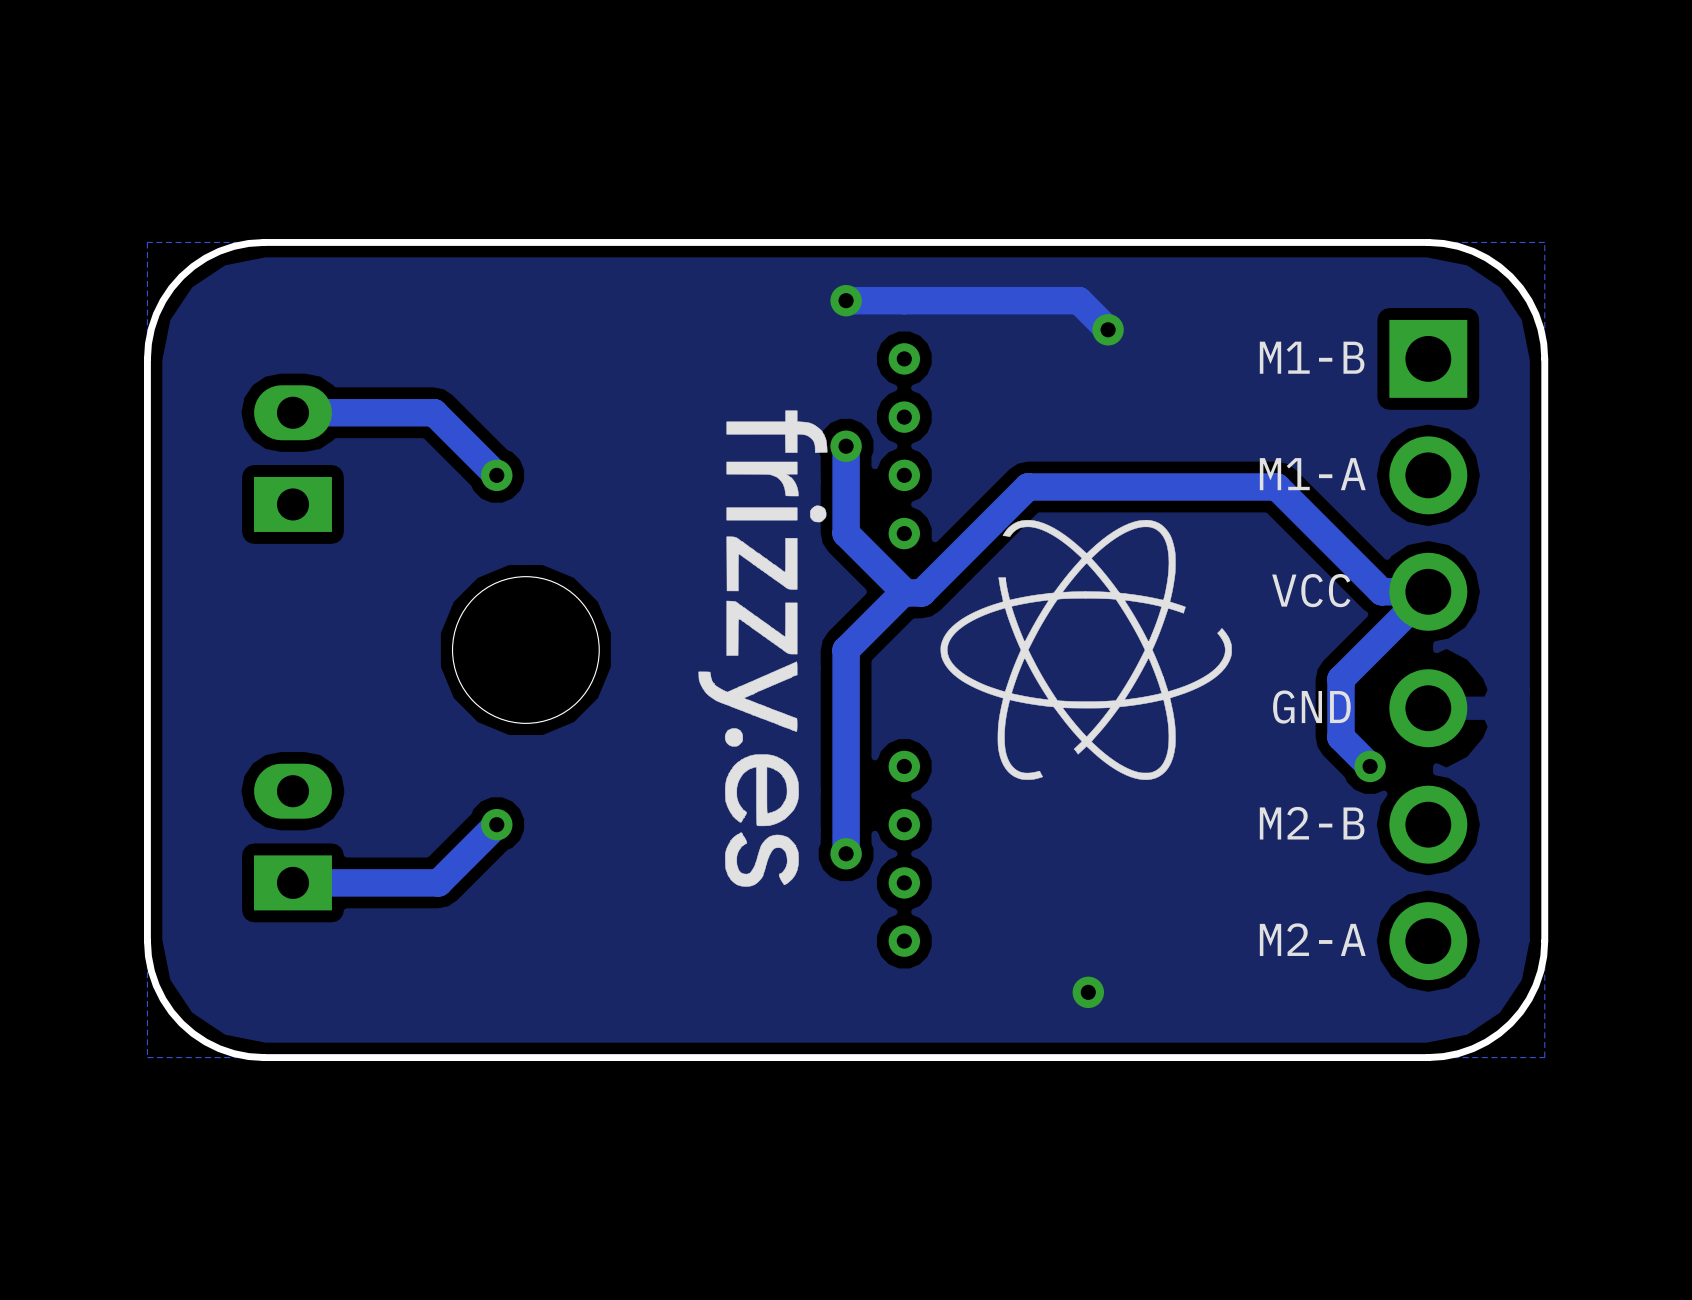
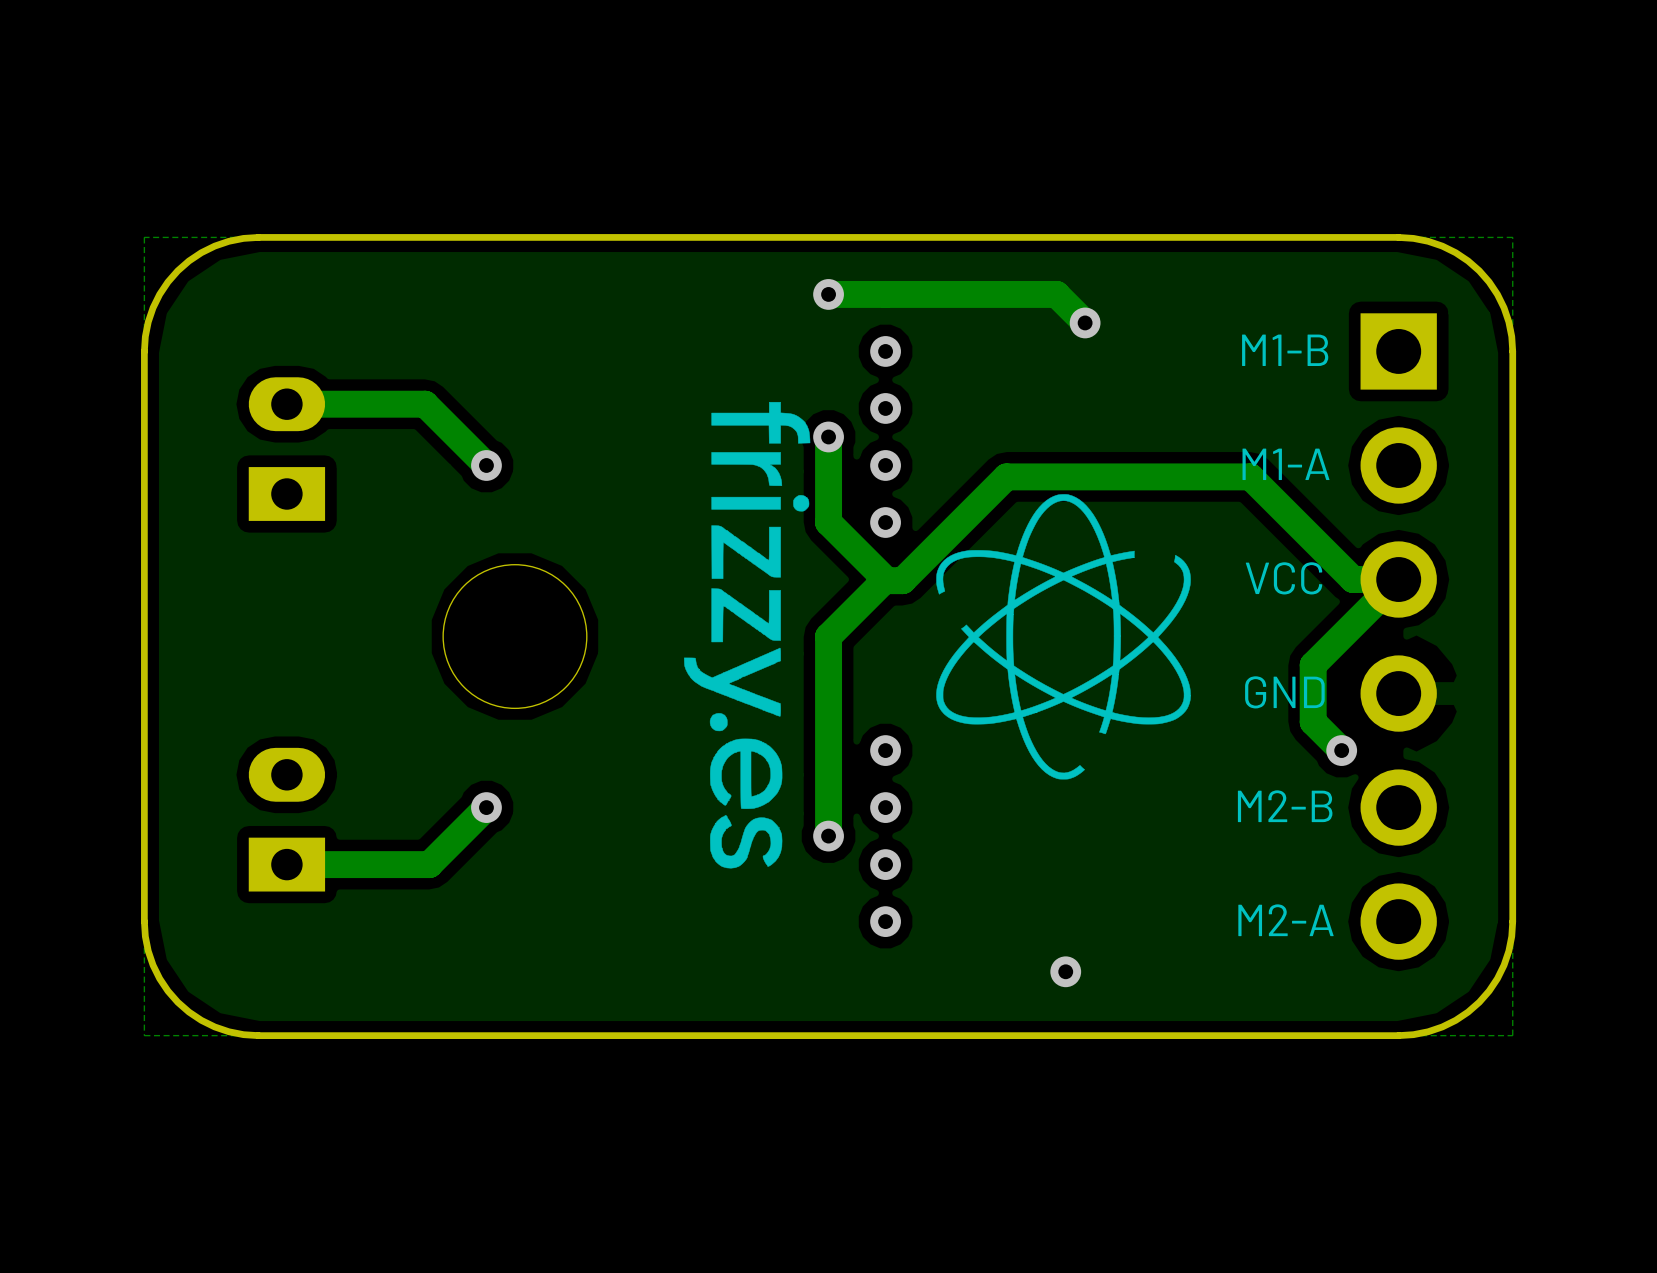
drawing shape: [940, 519, 1232, 780] -> [936, 494, 1191, 780]

